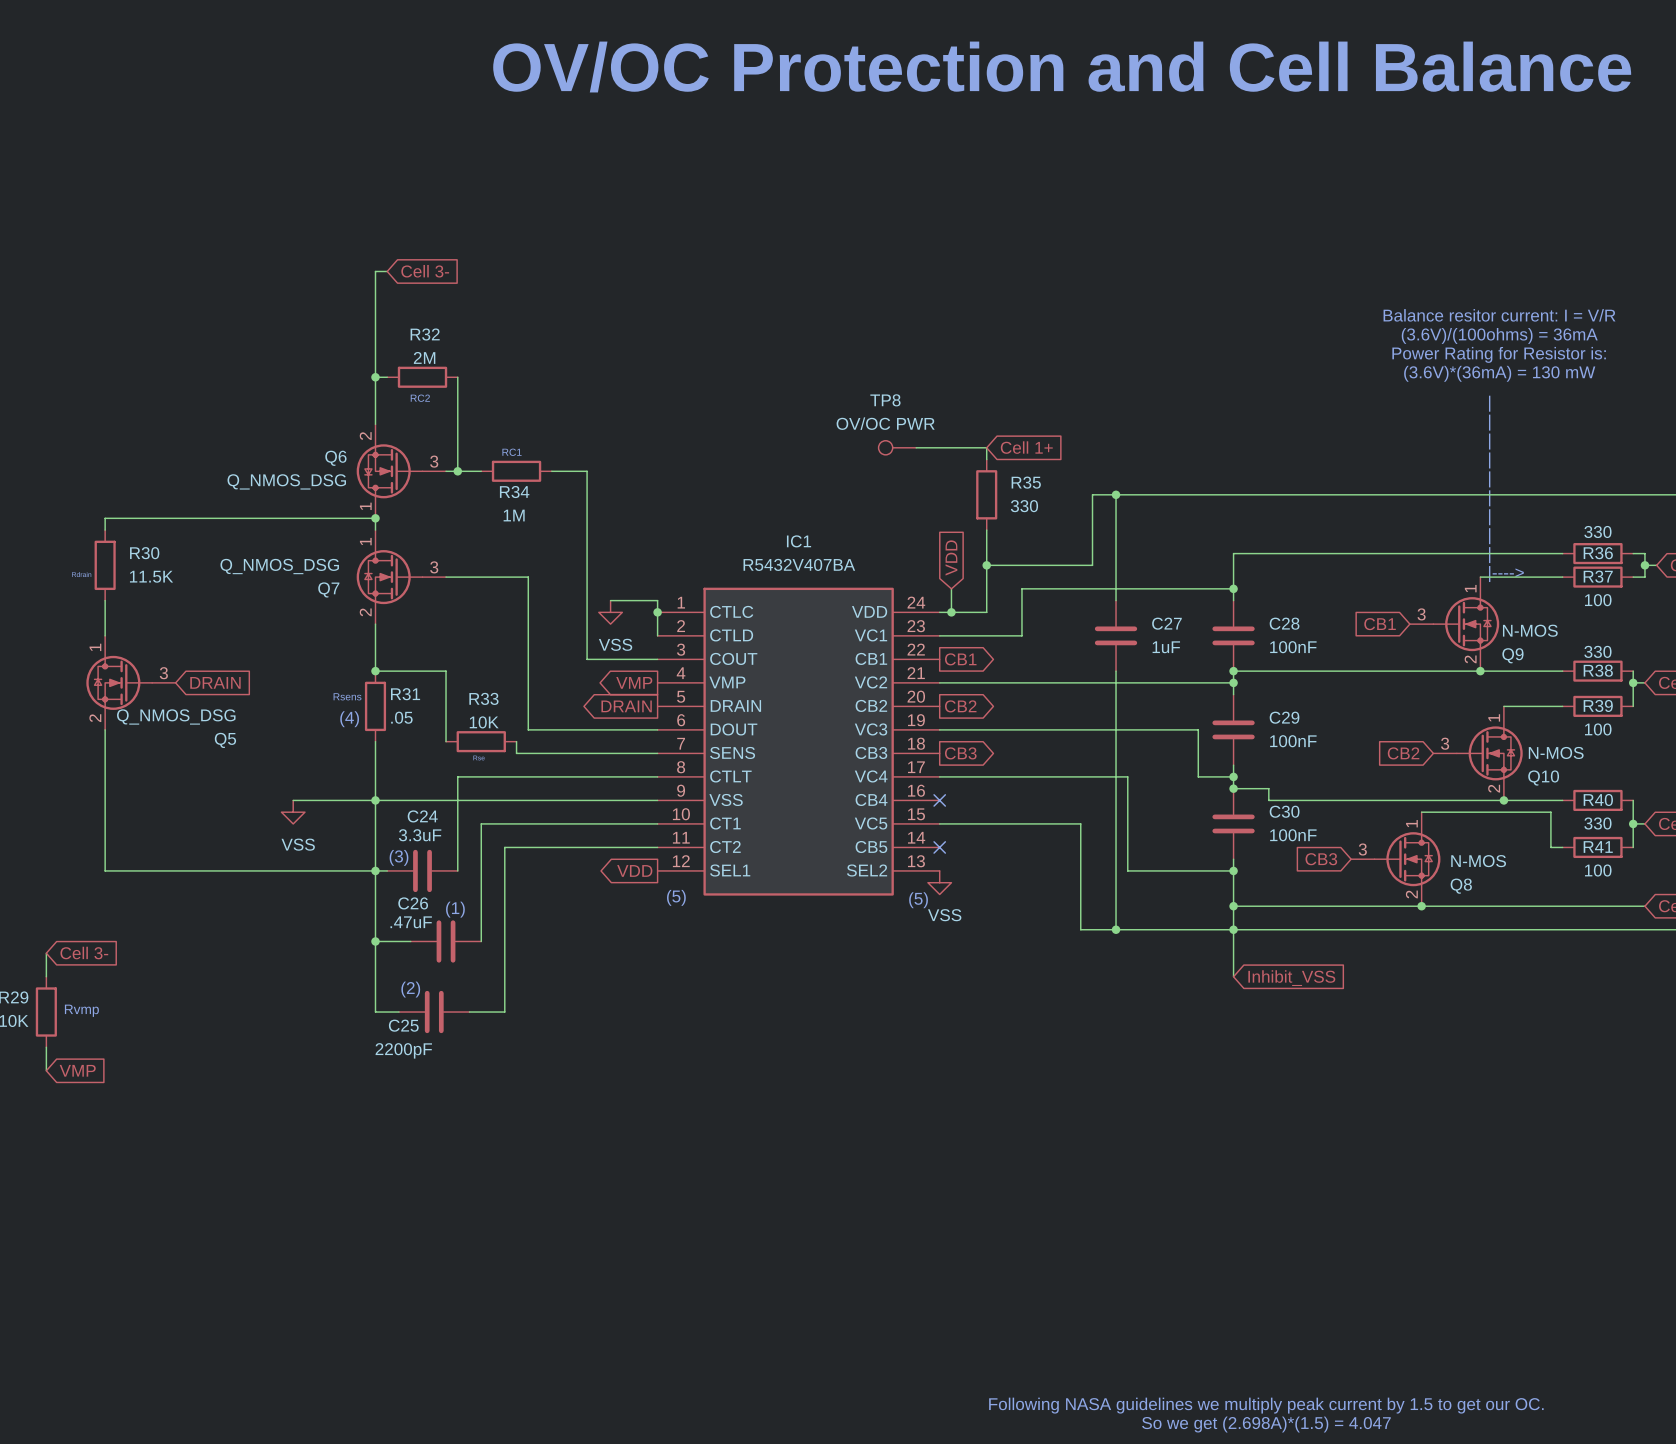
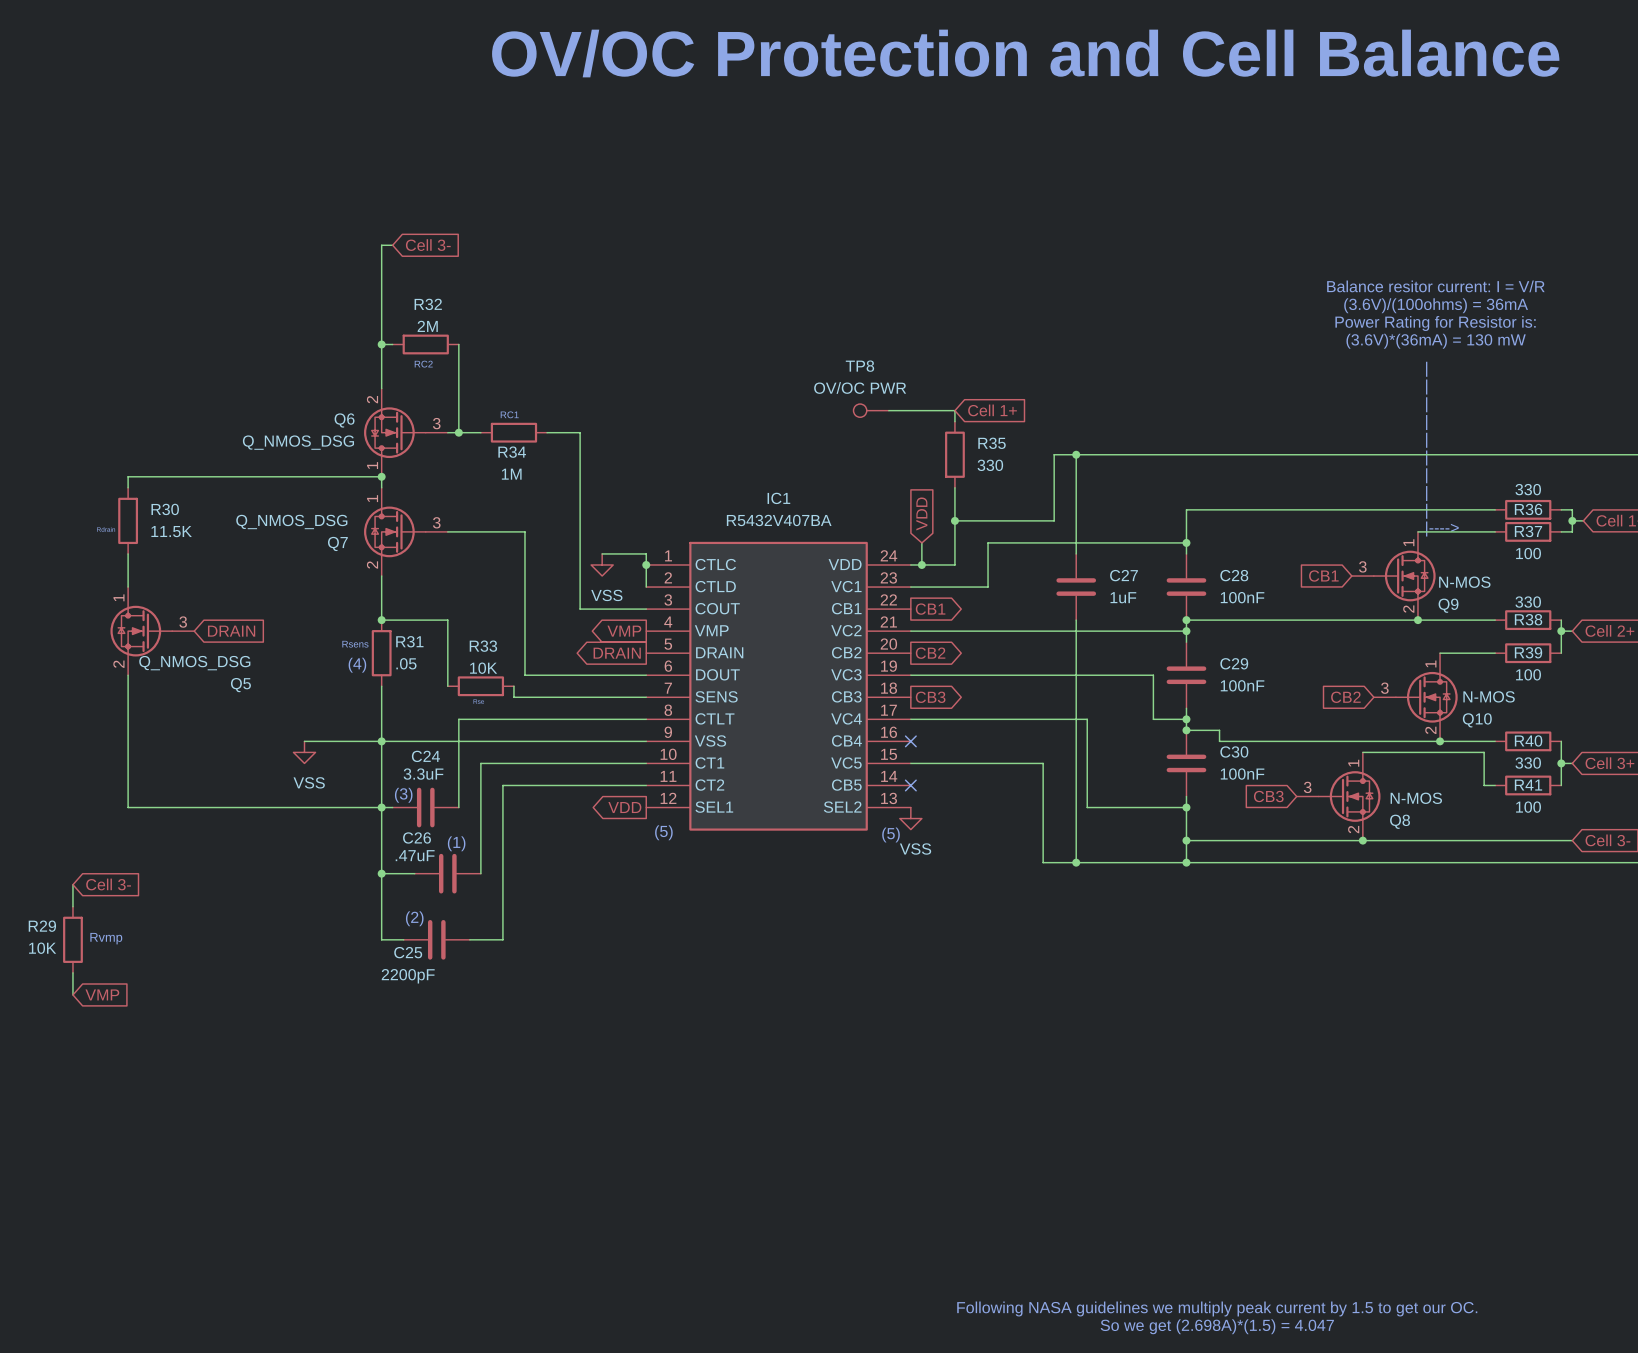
wire: (1233, 929) (1233, 976) -> none
global label: Inhibit_VSS (1291, 978) -> none

